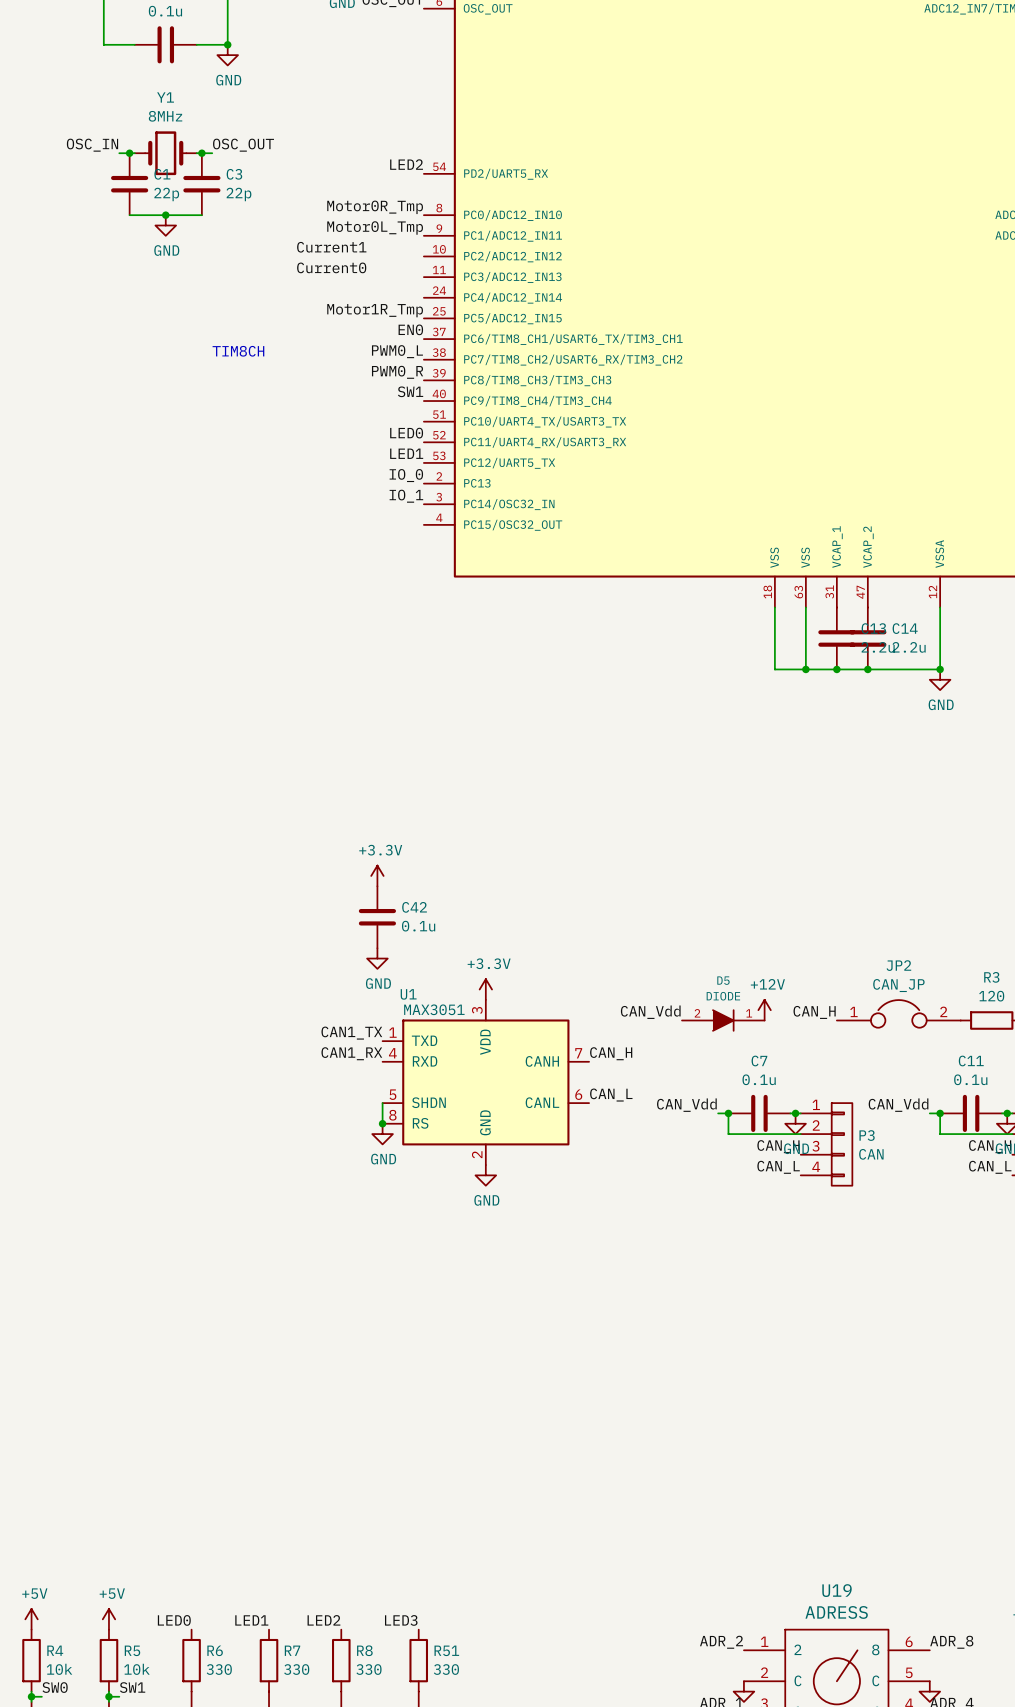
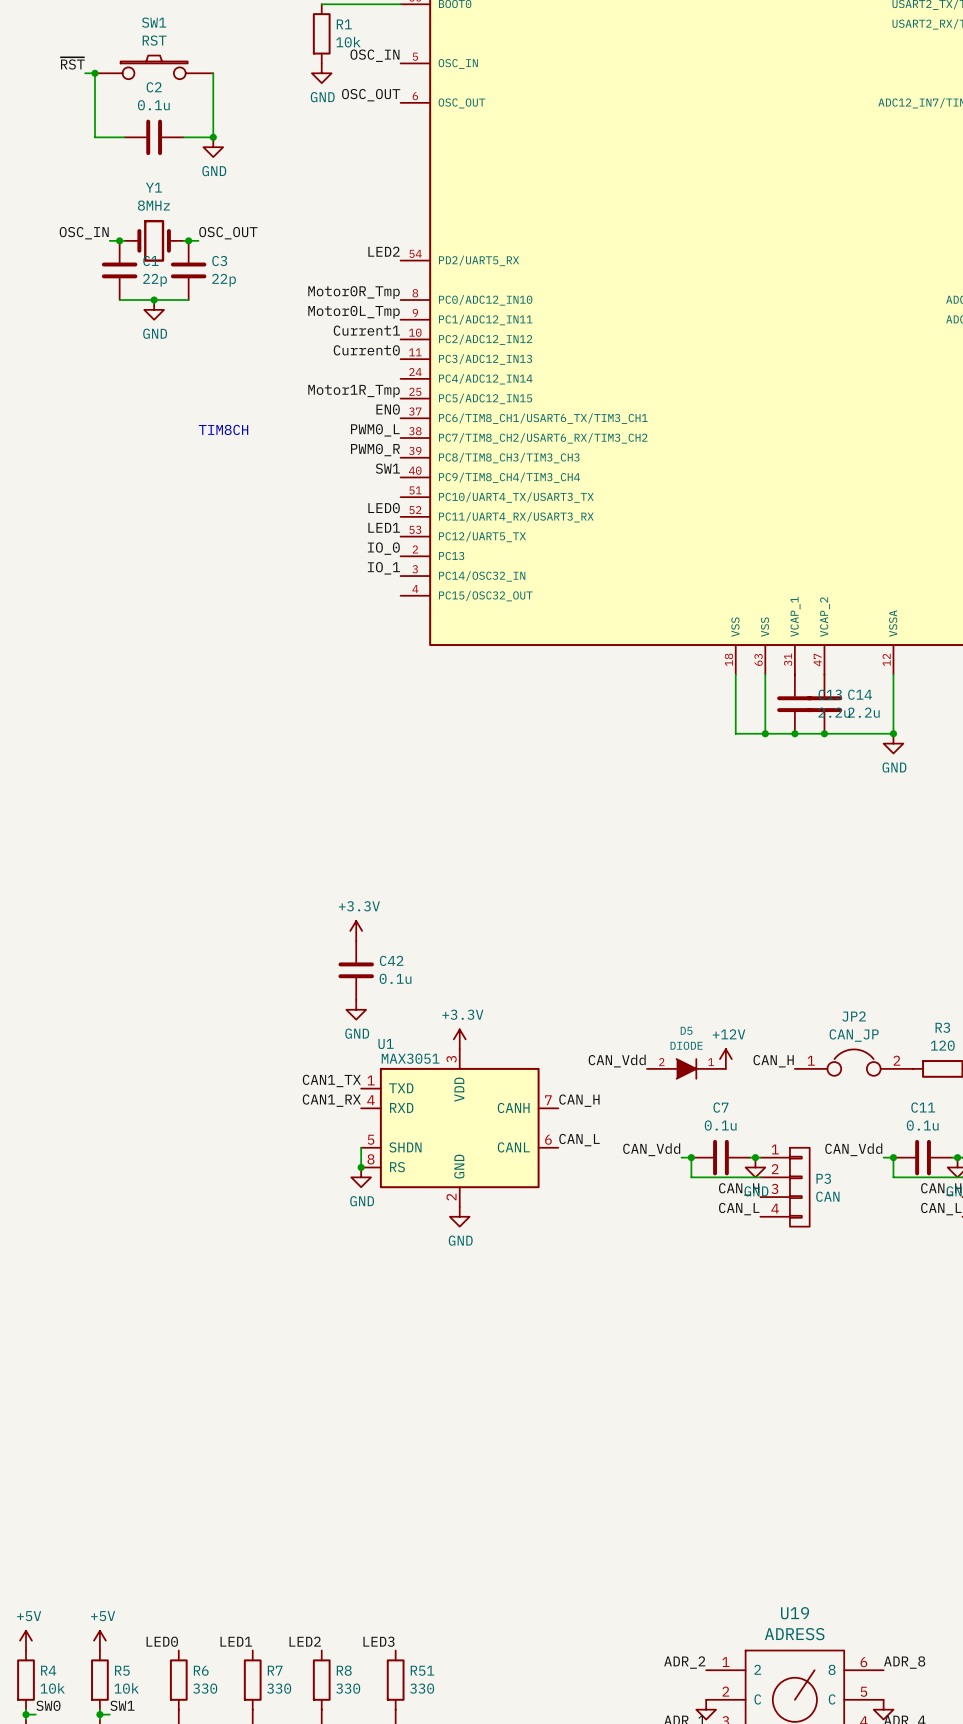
label position: Current1 (331, 247) -> Current1 (366, 330)
label position: Current0 (331, 267) -> Current0 (366, 350)

